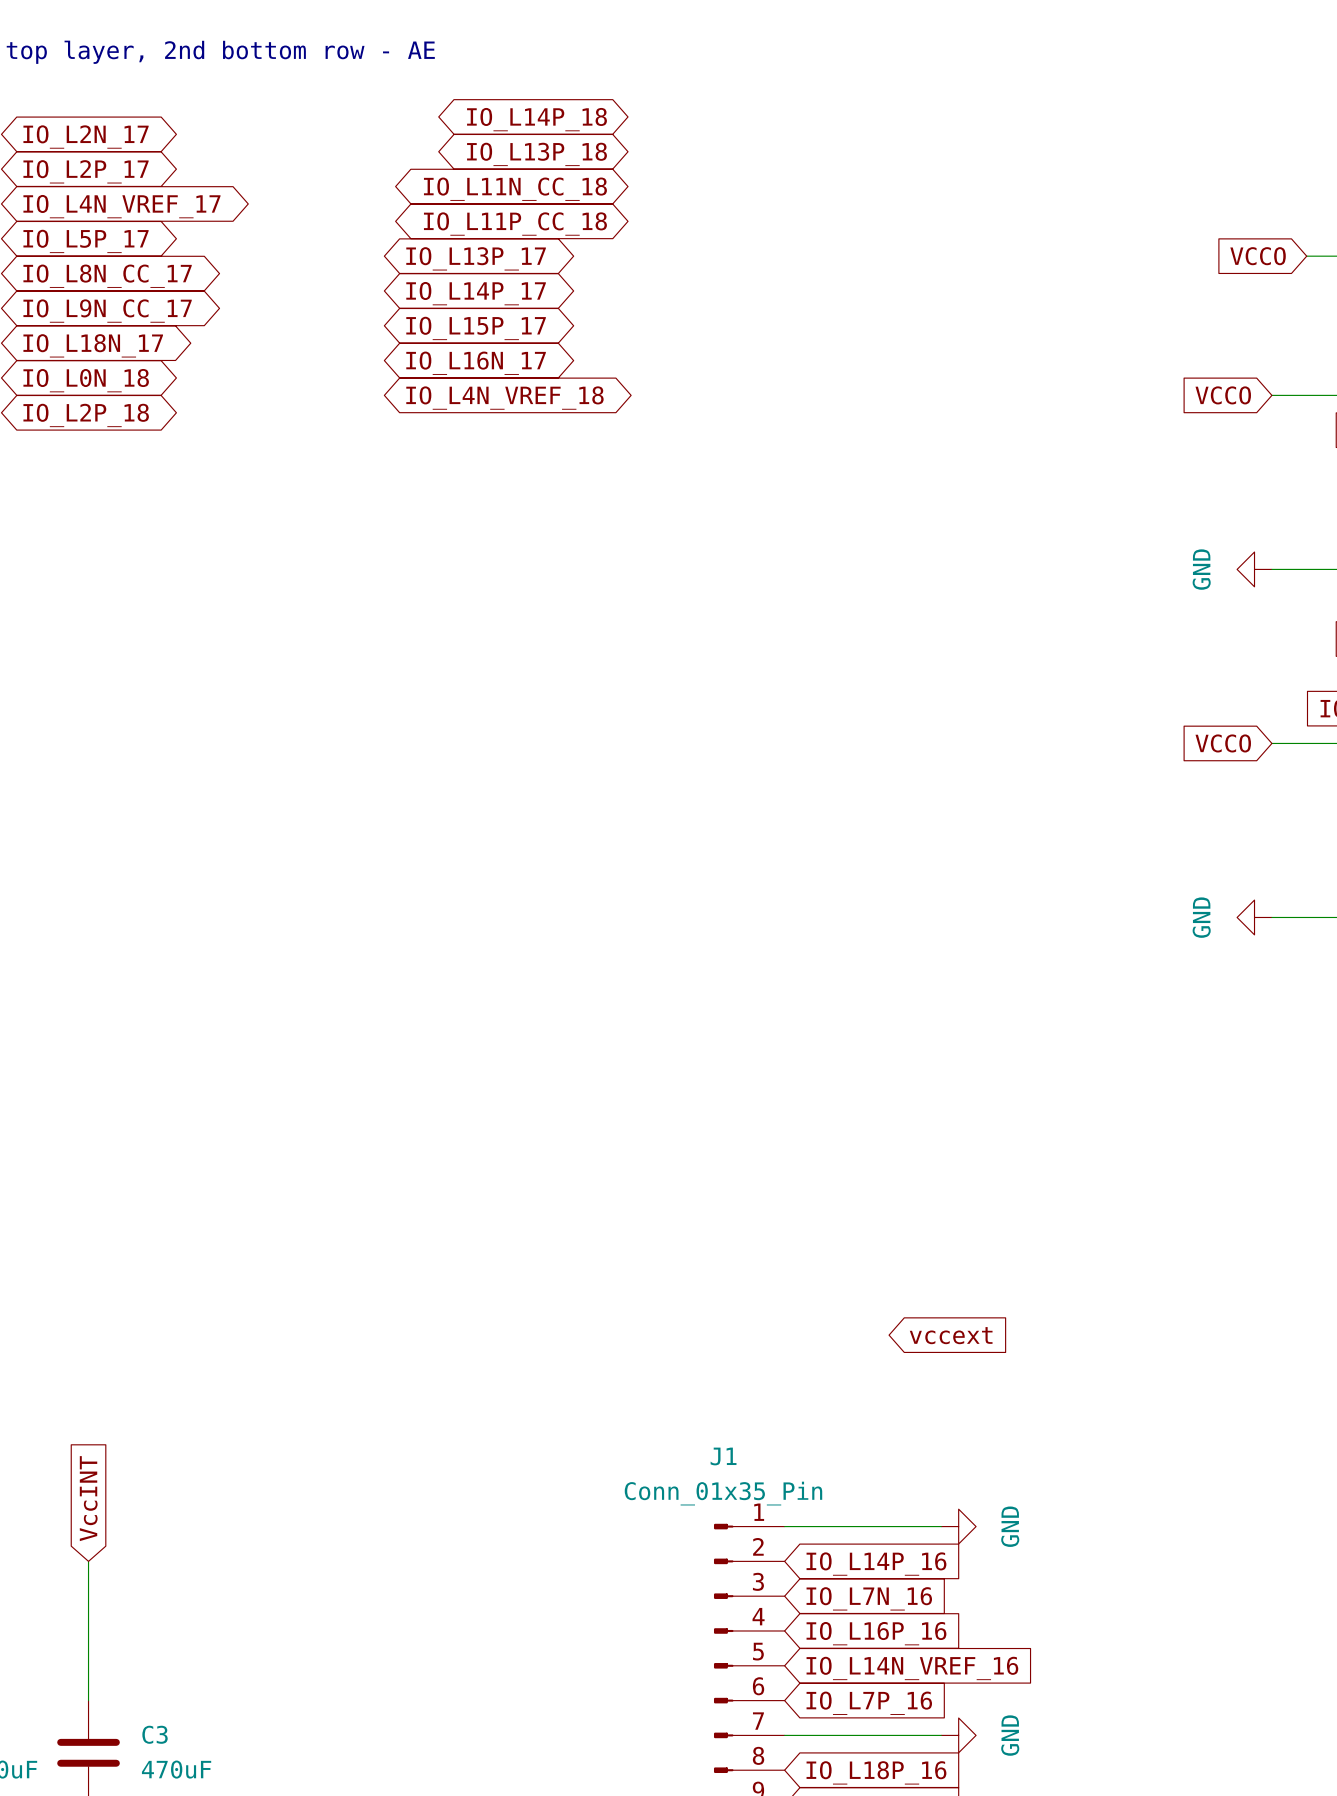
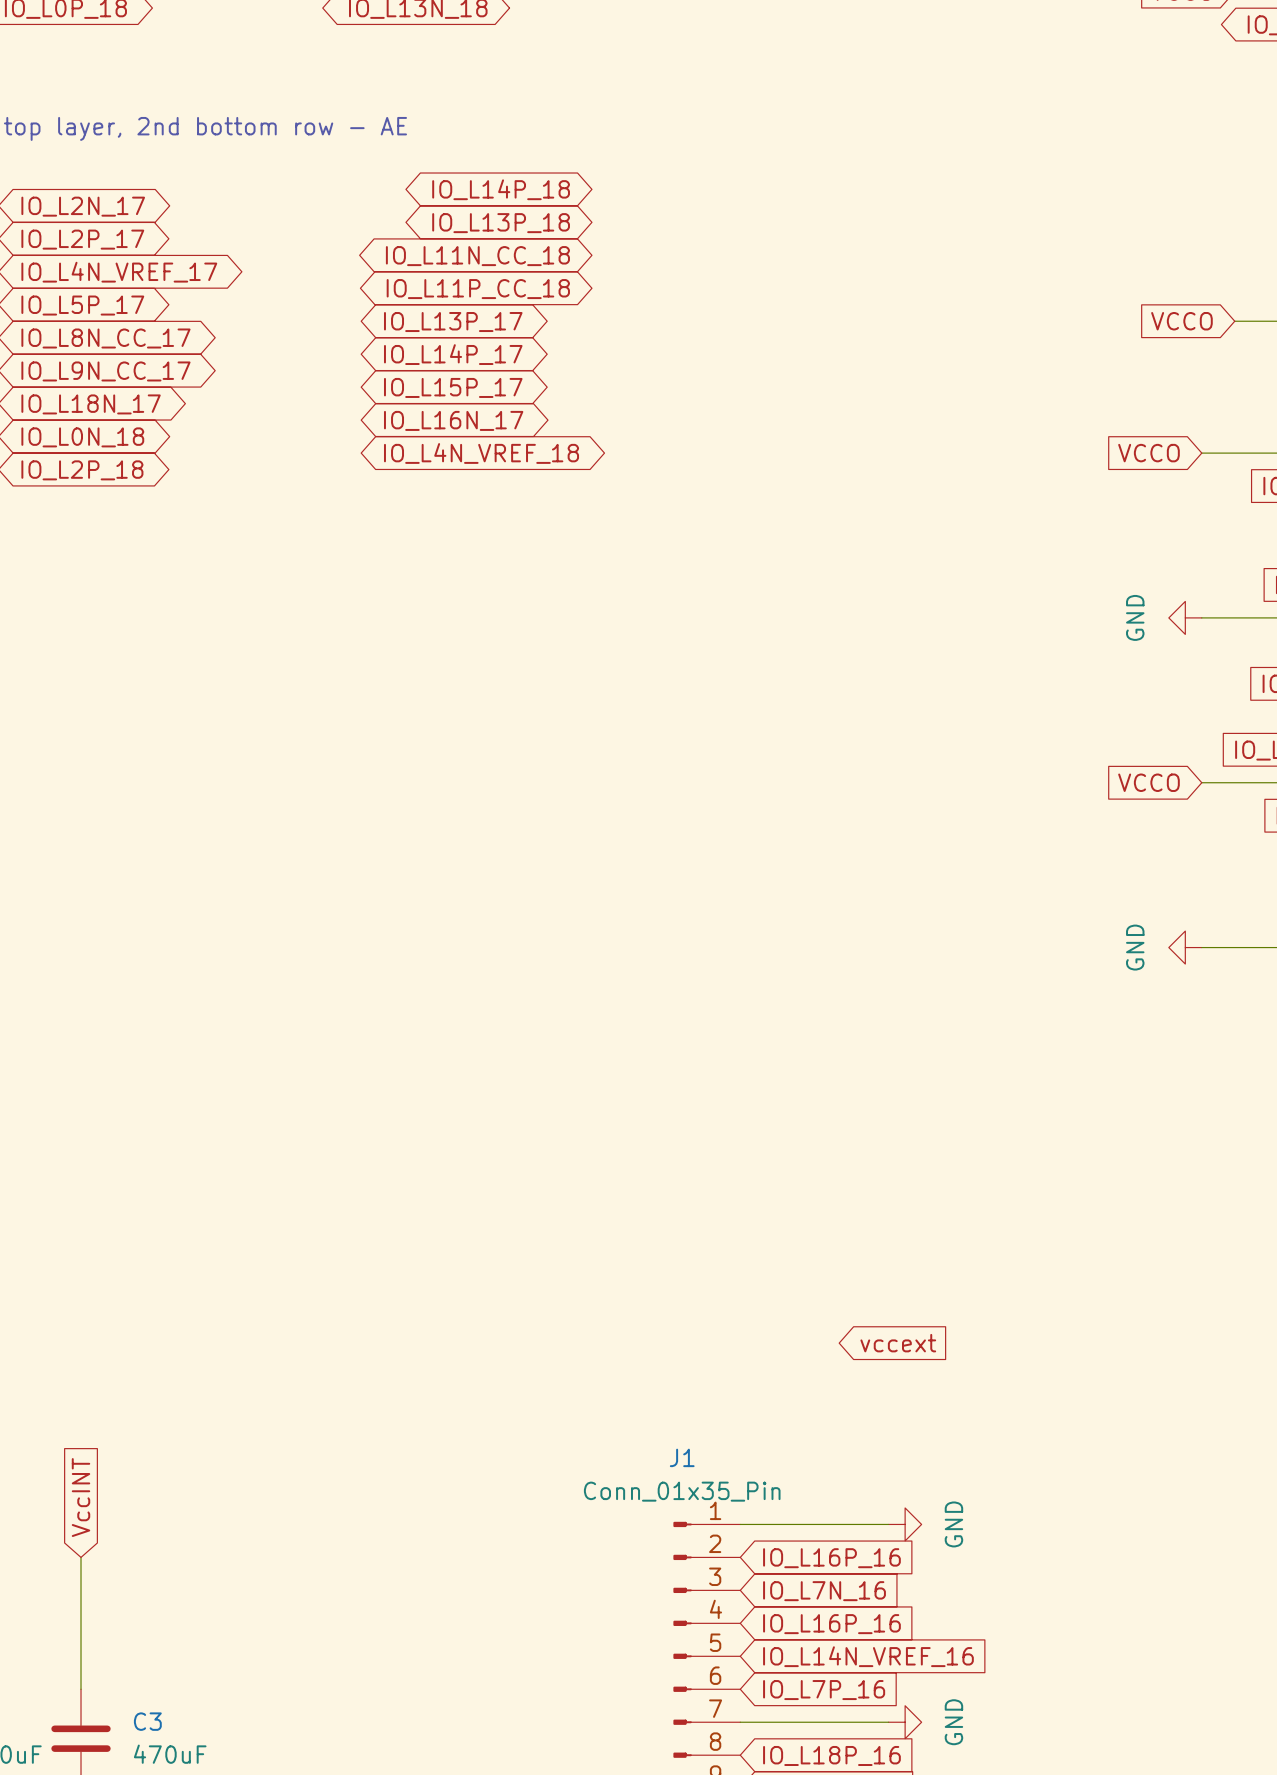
global label: IO_L14P_16 (876, 1564) -> IO_L16P_16 (831, 1558)

